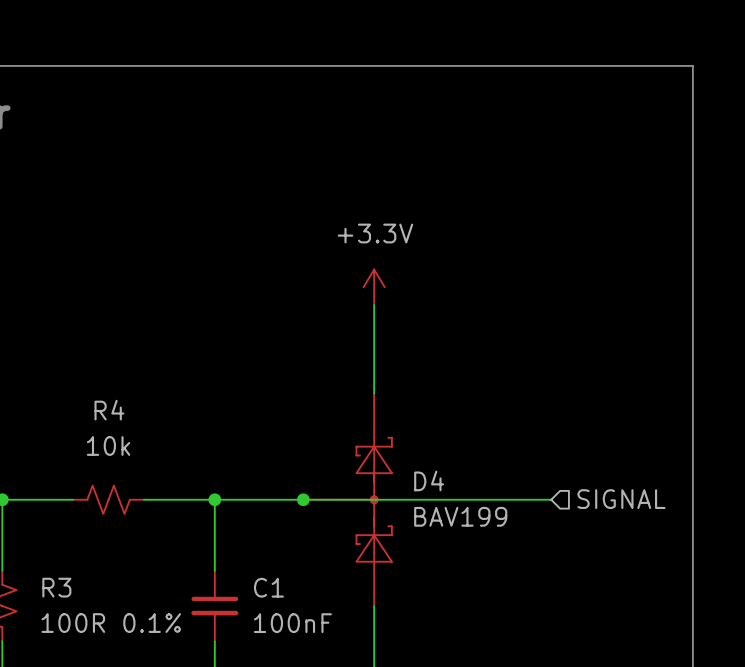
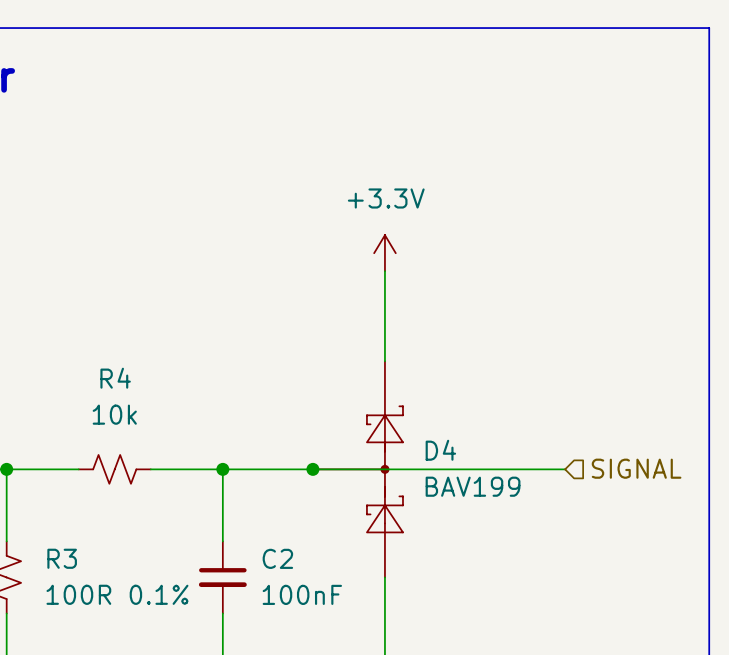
C1 name: C1 (268, 587) -> C2 (277, 558)

